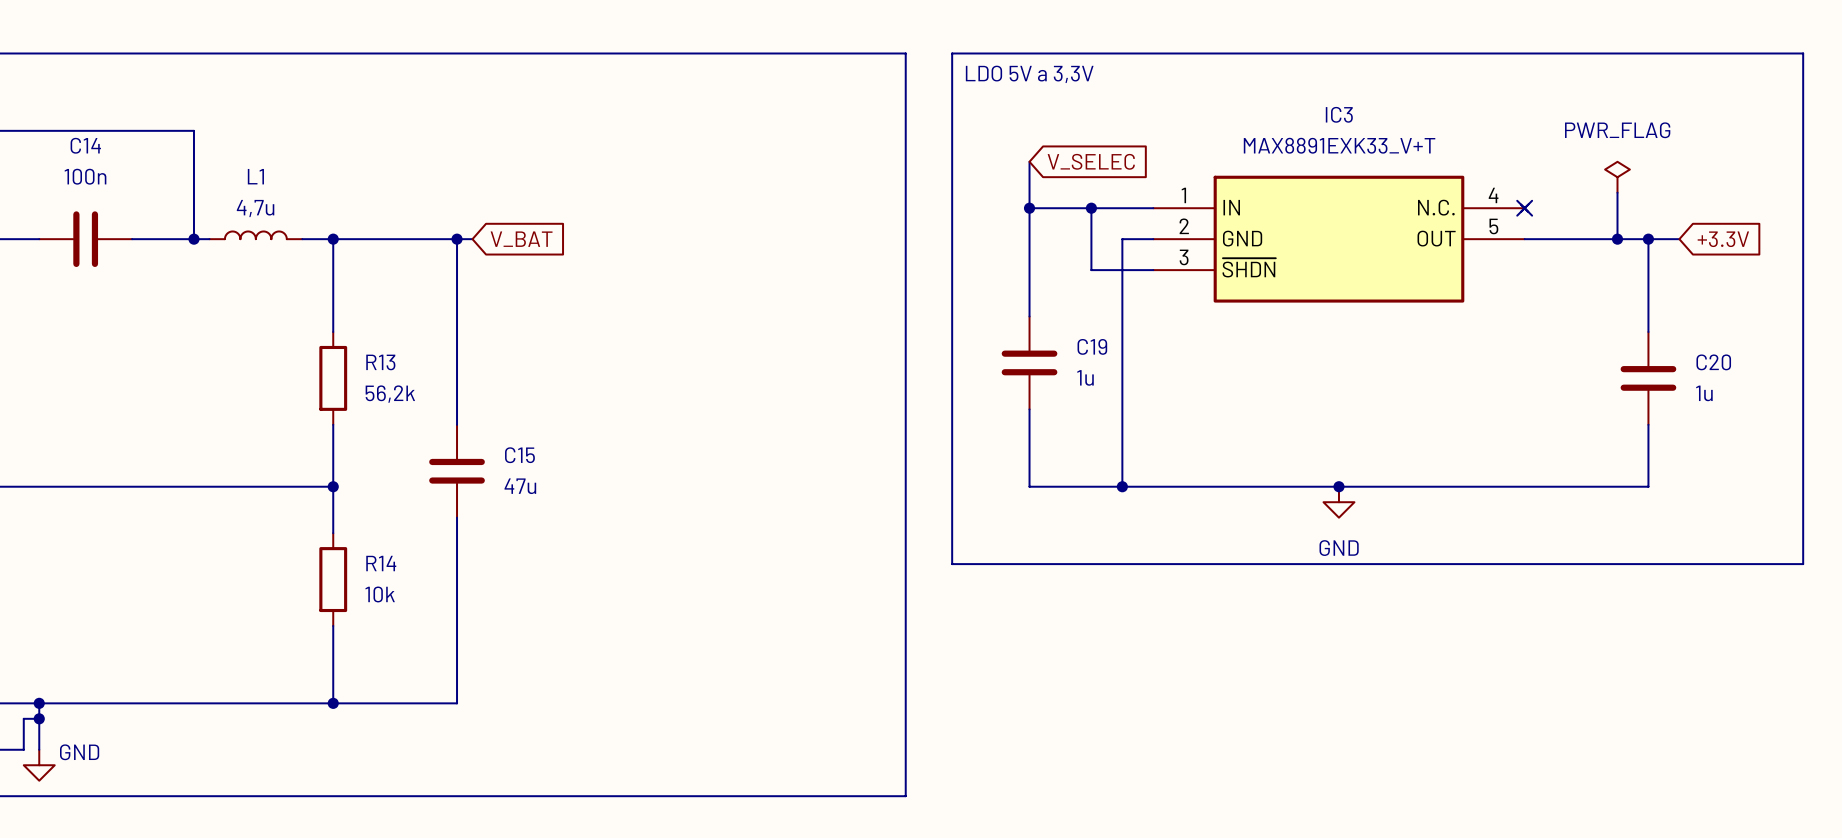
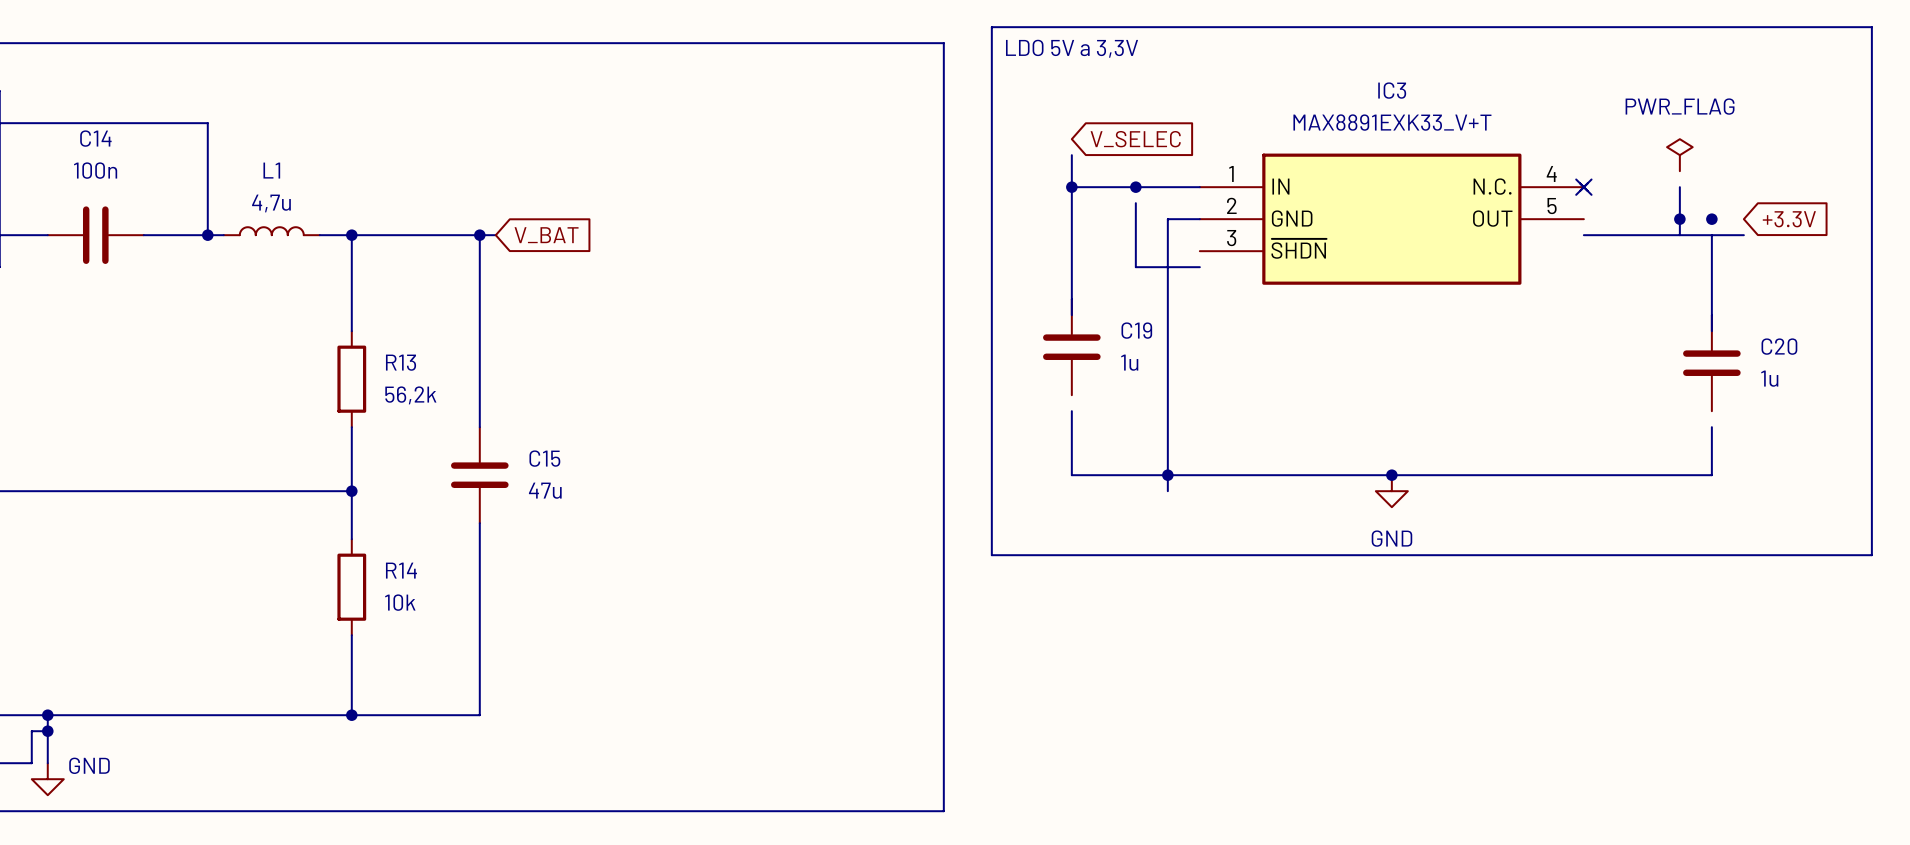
line: (952, 53) (1803, 53) -> (991, 43) (991, 27) (1871, 27) (1871, 43)
text position: LDO 5V a 3,3V (1029, 74) -> LDO 5V a 3,3V (1072, 48)
global label position: V_SELEC (1091, 161) -> V_SELEC (1135, 139)
power symbol position: PWR_FLAG (1617, 177) -> PWR_FLAG (1679, 155)
wire: (1029, 208) (1153, 208) -> (1071, 187) (1199, 187)
junction position: (1029, 208) -> (1071, 187)
junction position: (1091, 208) -> (1135, 187)
no-connect mark position: (1524, 208) -> (1583, 187)
wire: (1122, 239) (1153, 239) -> (1167, 235) (1167, 219) (1199, 219)
IC3 position: (1340, 239) -> (1393, 219)
junction position: (1617, 239) -> (1679, 219)
junction position: (1648, 239) -> (1711, 219)
global label position: +3.3V (1723, 239) -> +3.3V (1789, 219)
C19 position: (1029, 362) -> (1071, 347)
C20 position: (1648, 378) -> (1711, 363)
wire: (1029, 471) (1029, 486) (1648, 486) (1648, 471) -> (1071, 475) (1711, 475)
junction position: (1122, 486) -> (1167, 475)
junction position: (1338, 486) -> (1391, 475)
power symbol position: GND (1338, 502) -> GND (1391, 491)
line: (952, 548) (952, 564) (1803, 564) (1803, 548) -> (991, 555) (1871, 555)

